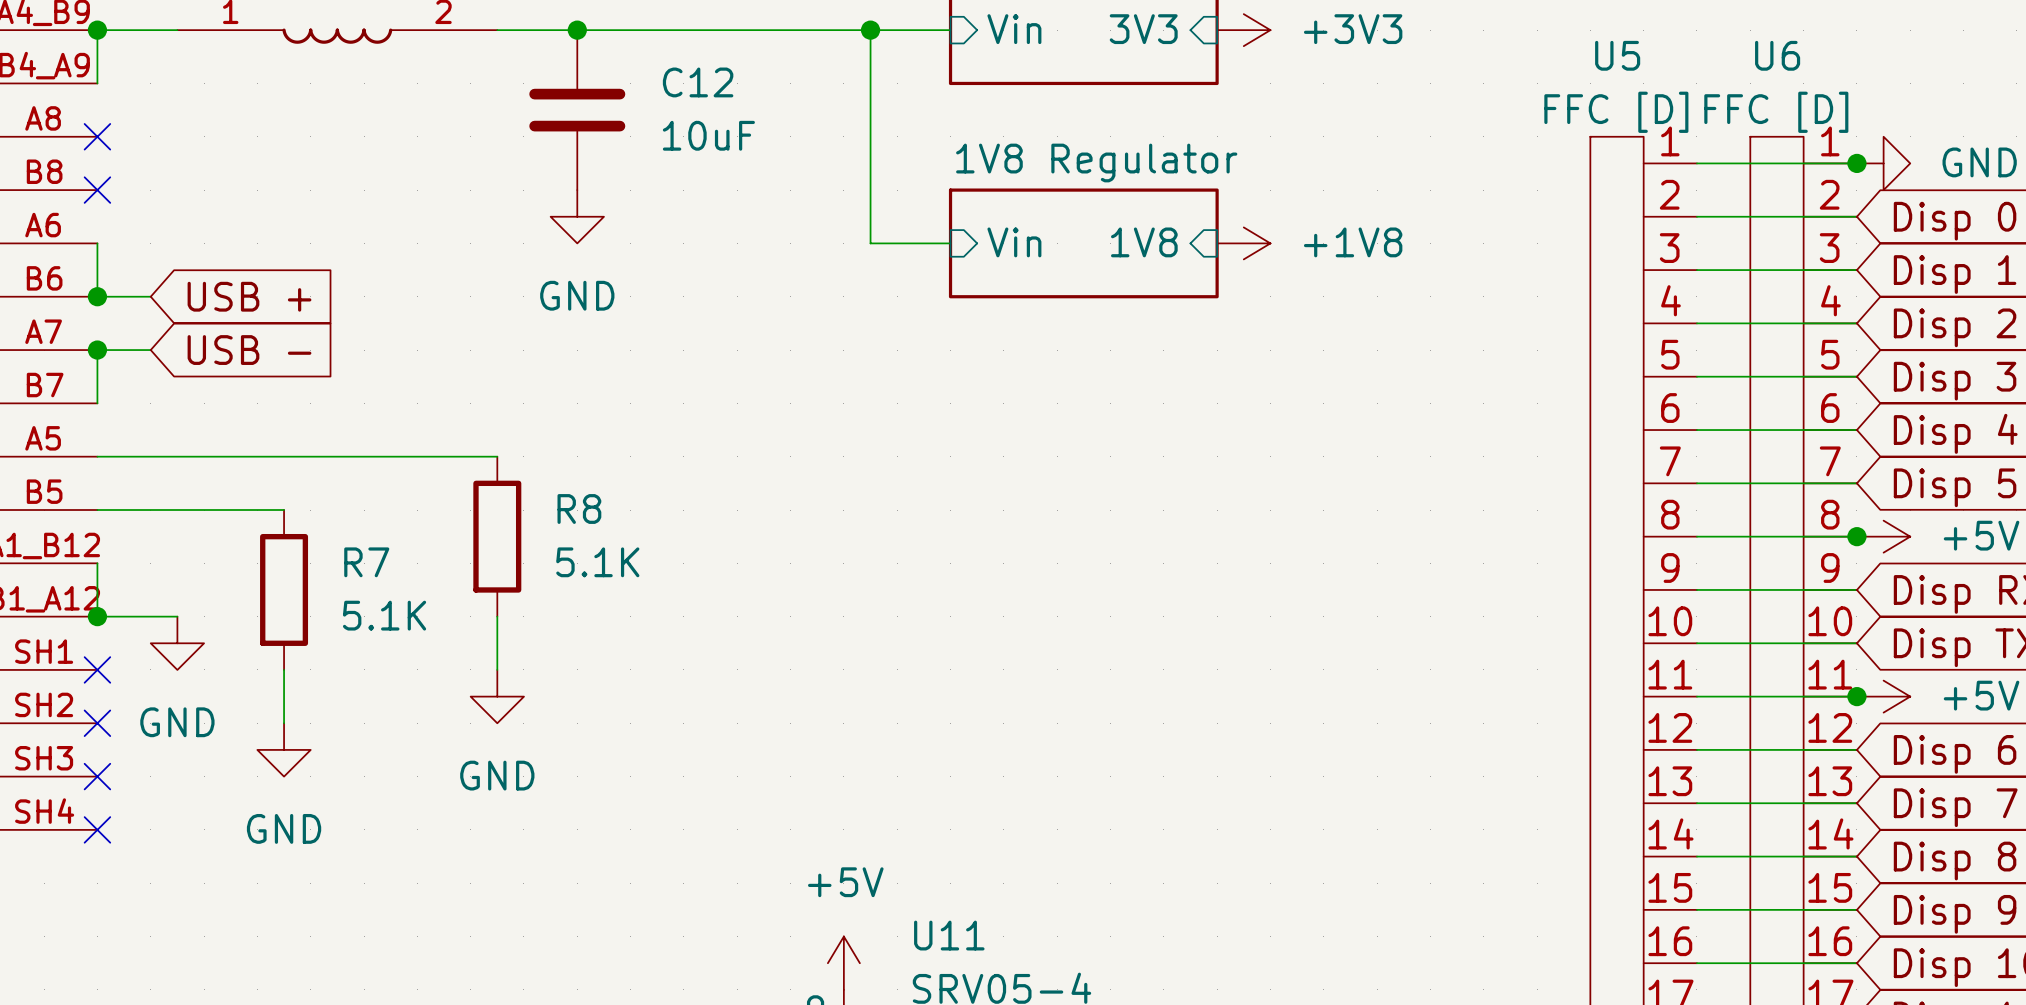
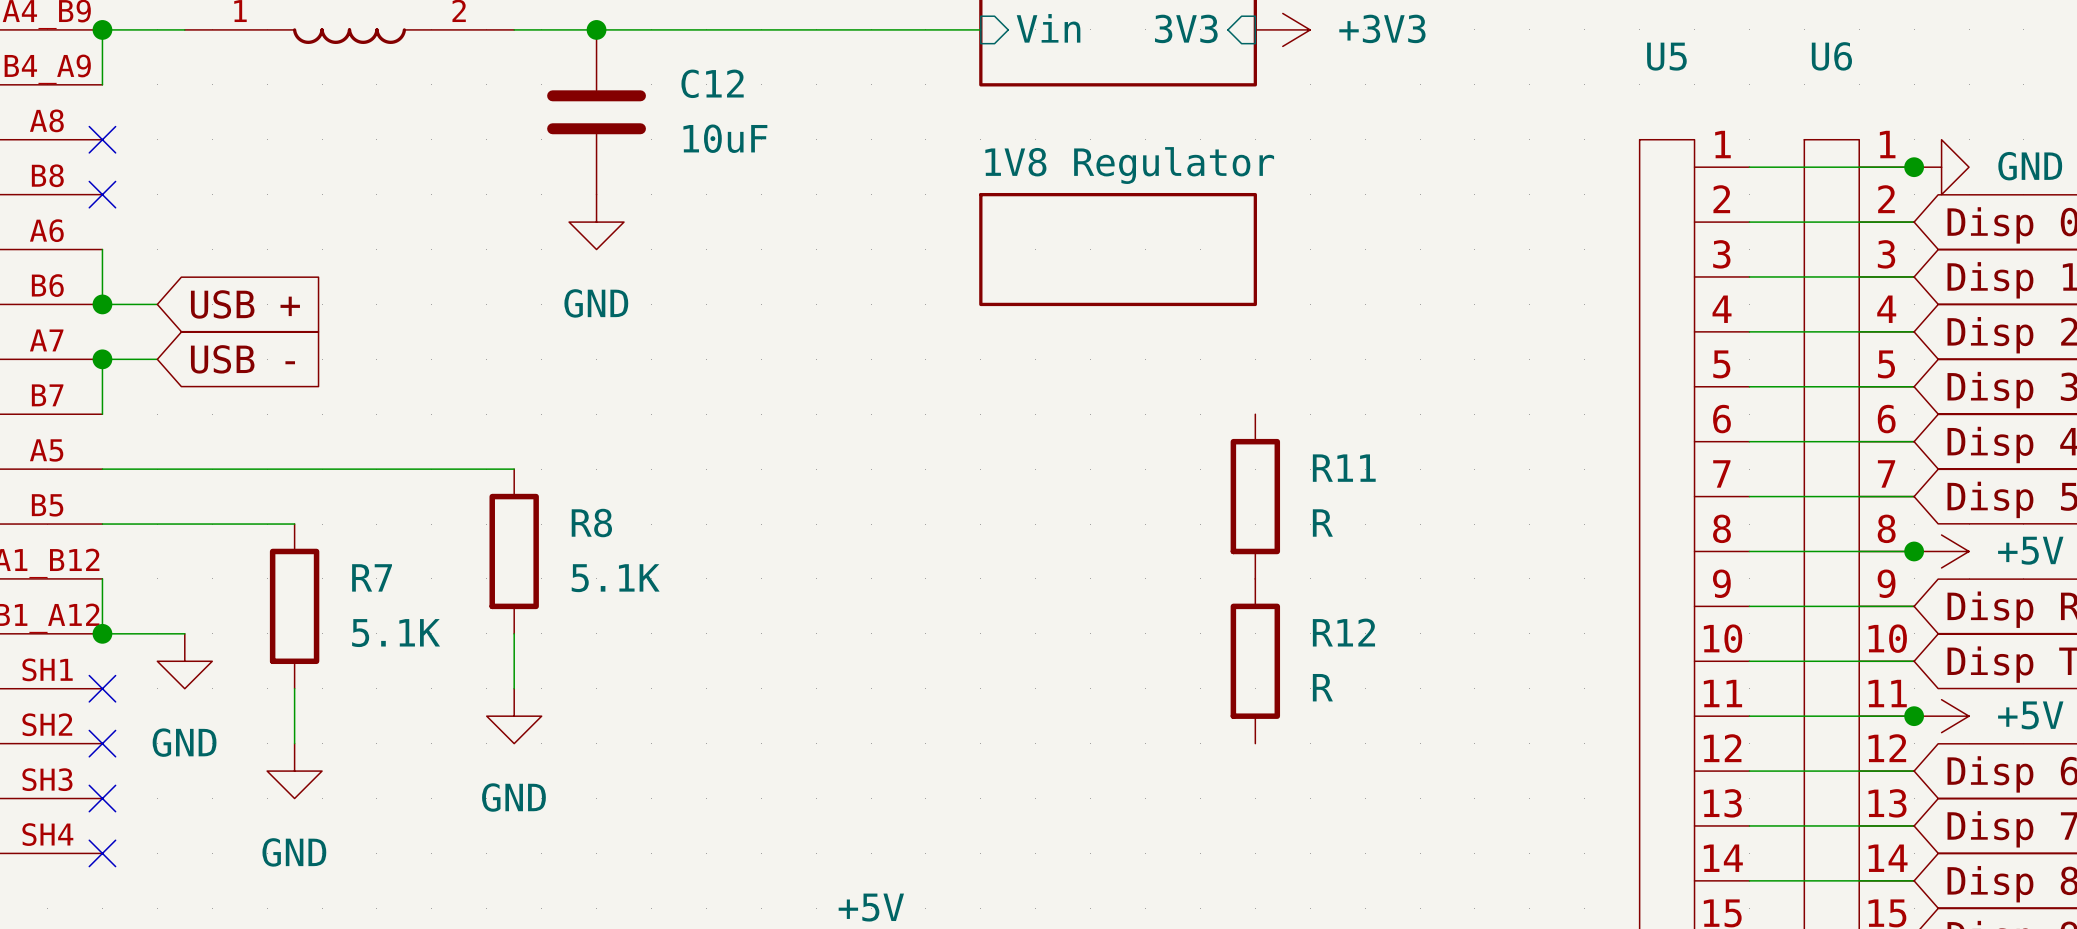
wire: (870, 30) (870, 243) (950, 243) -> none
junction: (870, 30) -> none
U5 value: FFC [D] (1616, 112) -> none
U6 value: FFC [D] (1776, 112) -> none
sheet pin: Vin (1014, 242) -> none
sheet pin: 1V8 (1144, 242) -> none
power symbol: +1V8 (1243, 243) -> none
R11: none -> R (1255, 496)
R12: none -> R (1255, 661)

